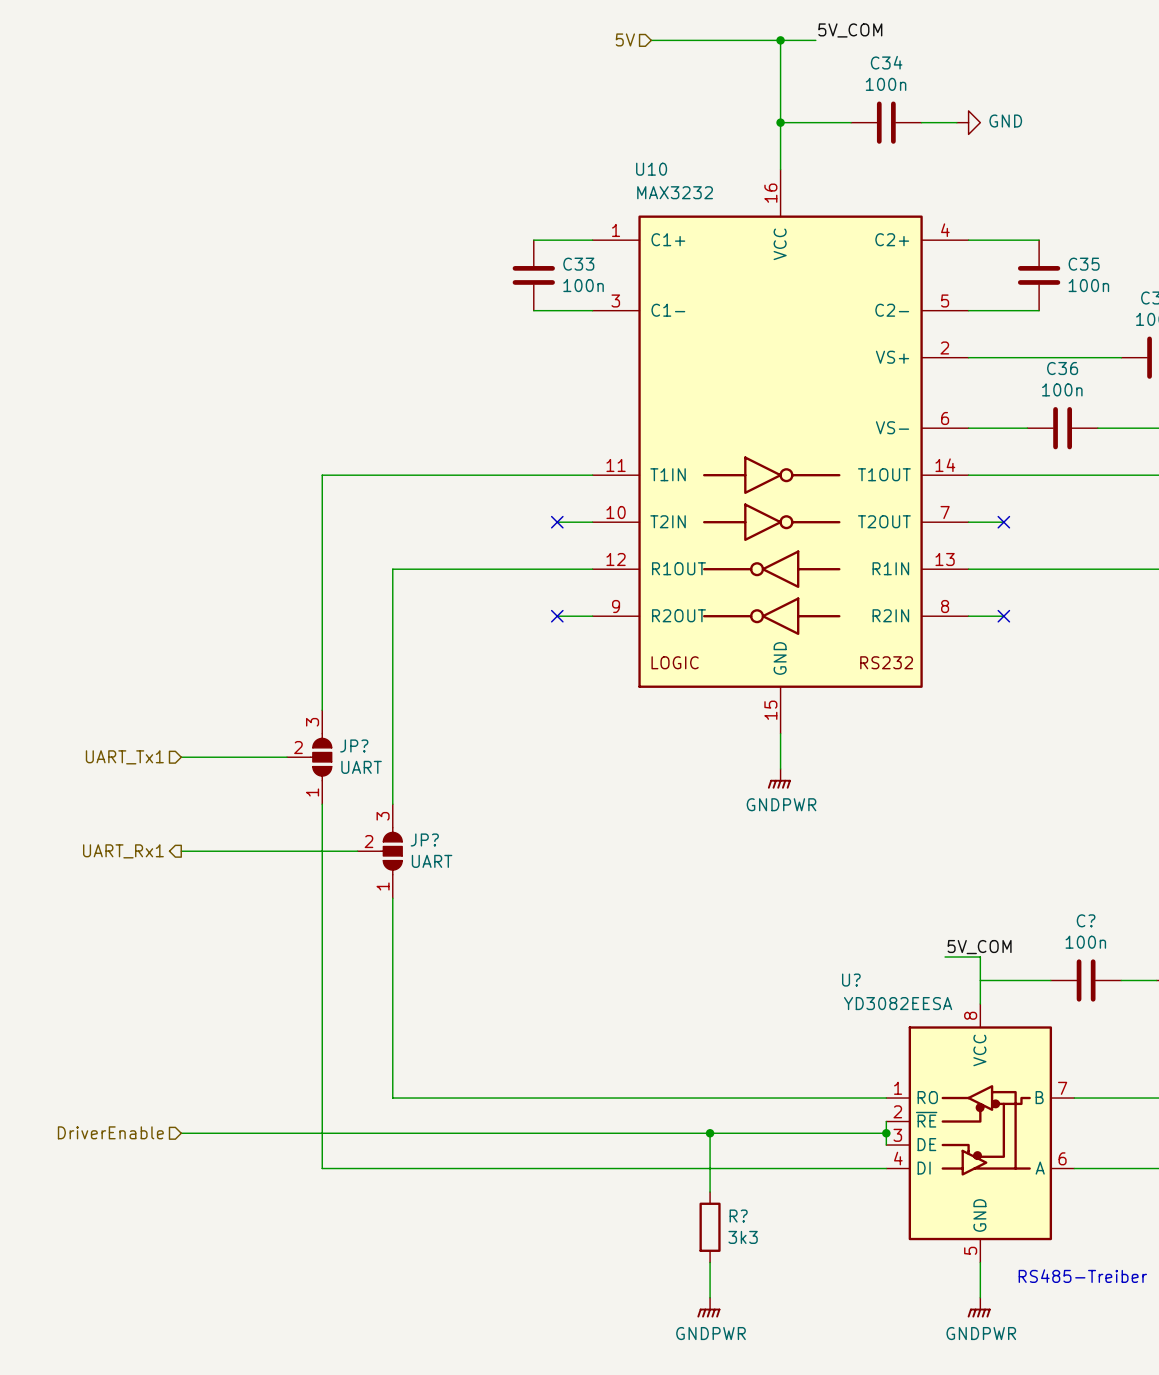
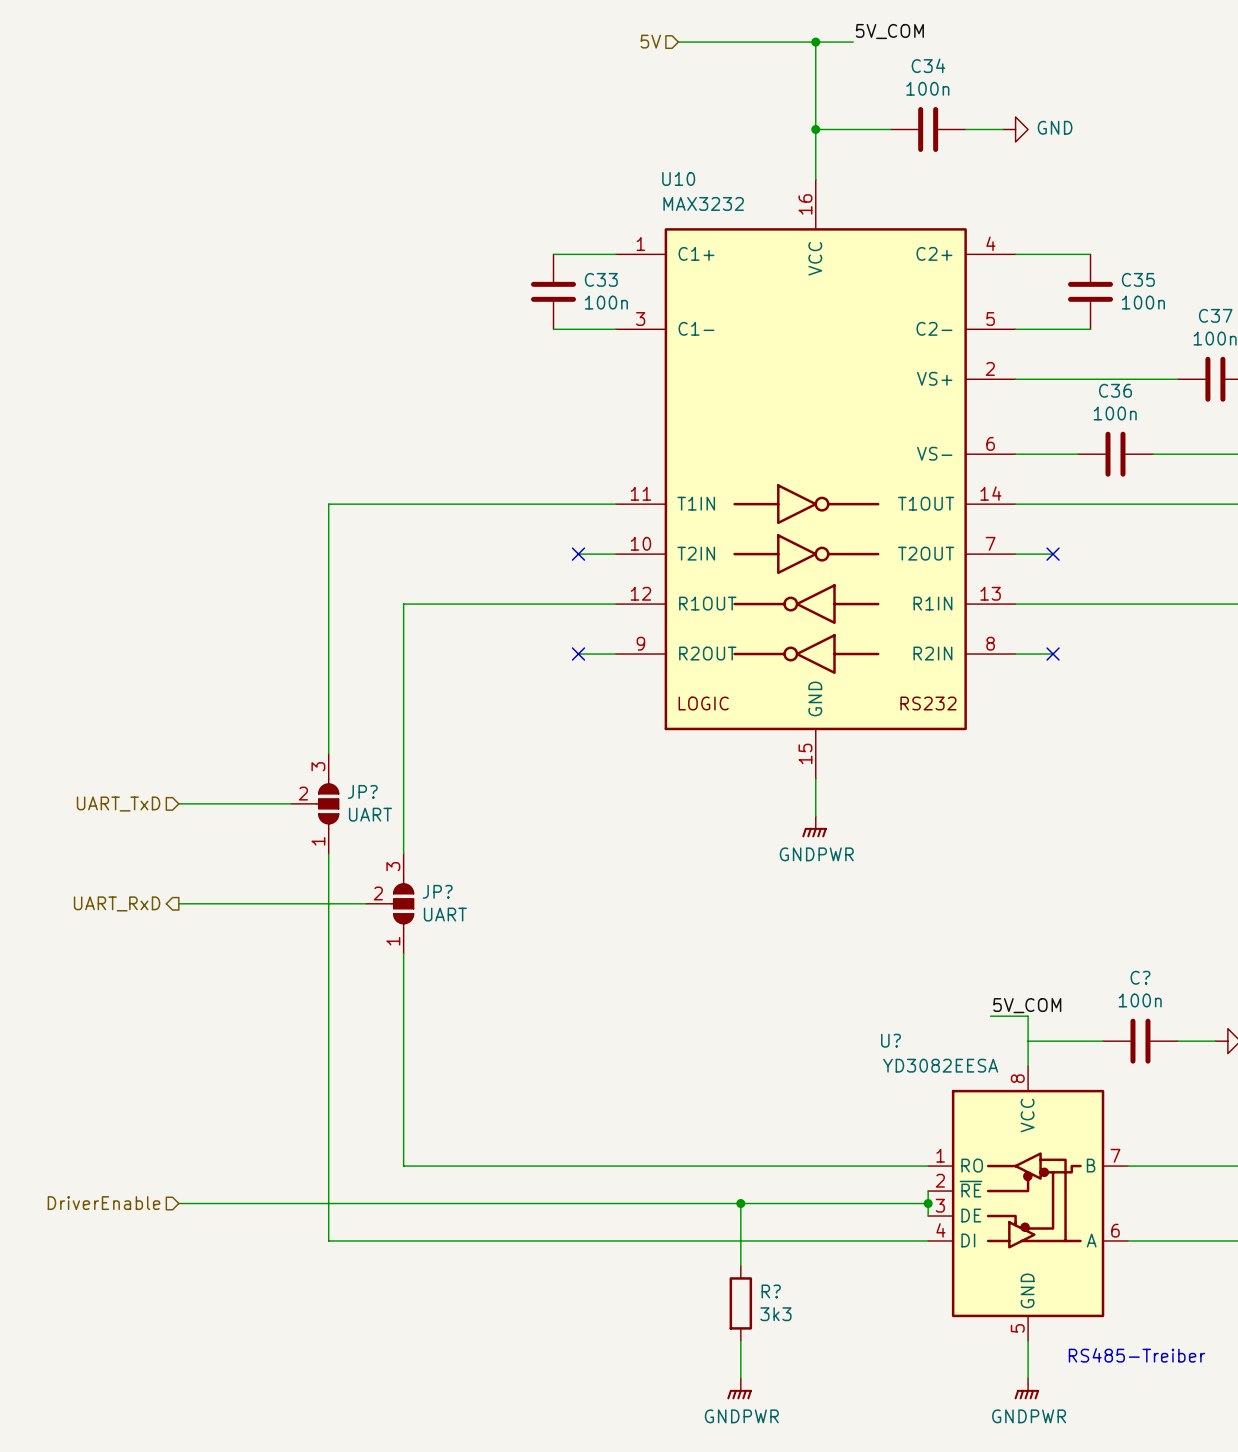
hierarchical label: UART_Tx1 (124, 757) -> UART_TxD (118, 804)
hierarchical label: UART_Rx1 (123, 851) -> UART_RxD (117, 903)

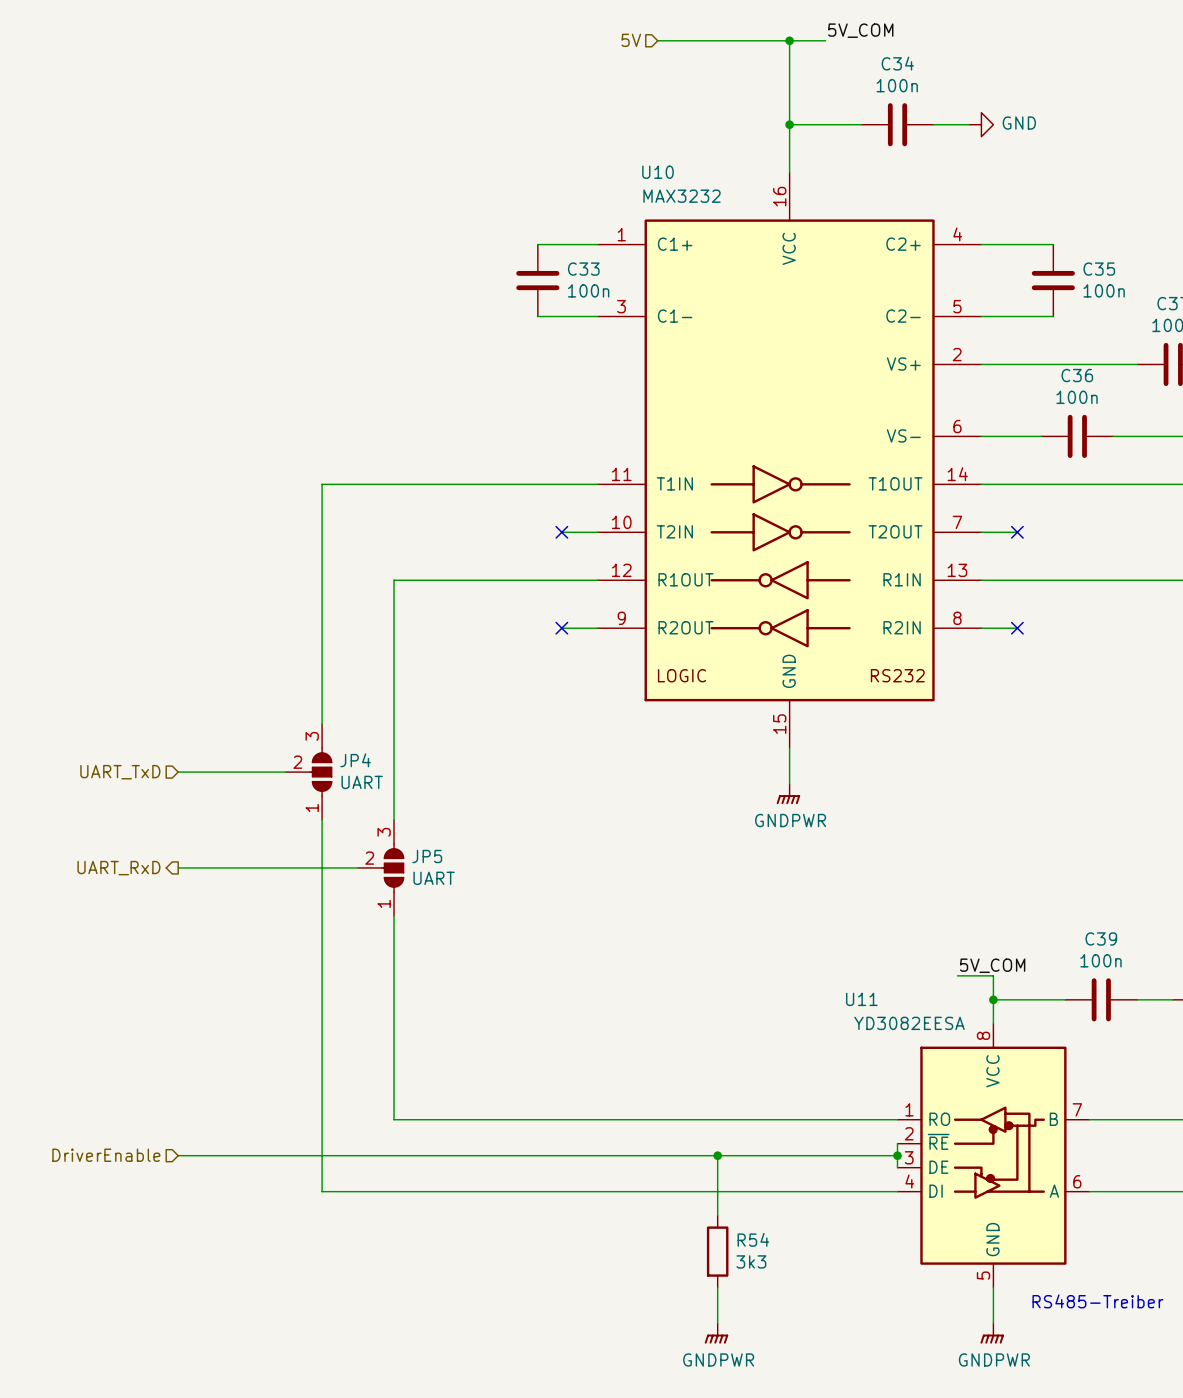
JP? name: JP? (362, 791) -> JP4 (355, 760)
JP? name: JP? (437, 891) -> JP5 (427, 856)
C? name: C? (1140, 977) -> C39 (1101, 938)
U? name: U? (890, 1040) -> U11 (861, 999)
junction: none -> (993, 999)
R? name: R? (771, 1291) -> R54 (753, 1239)

